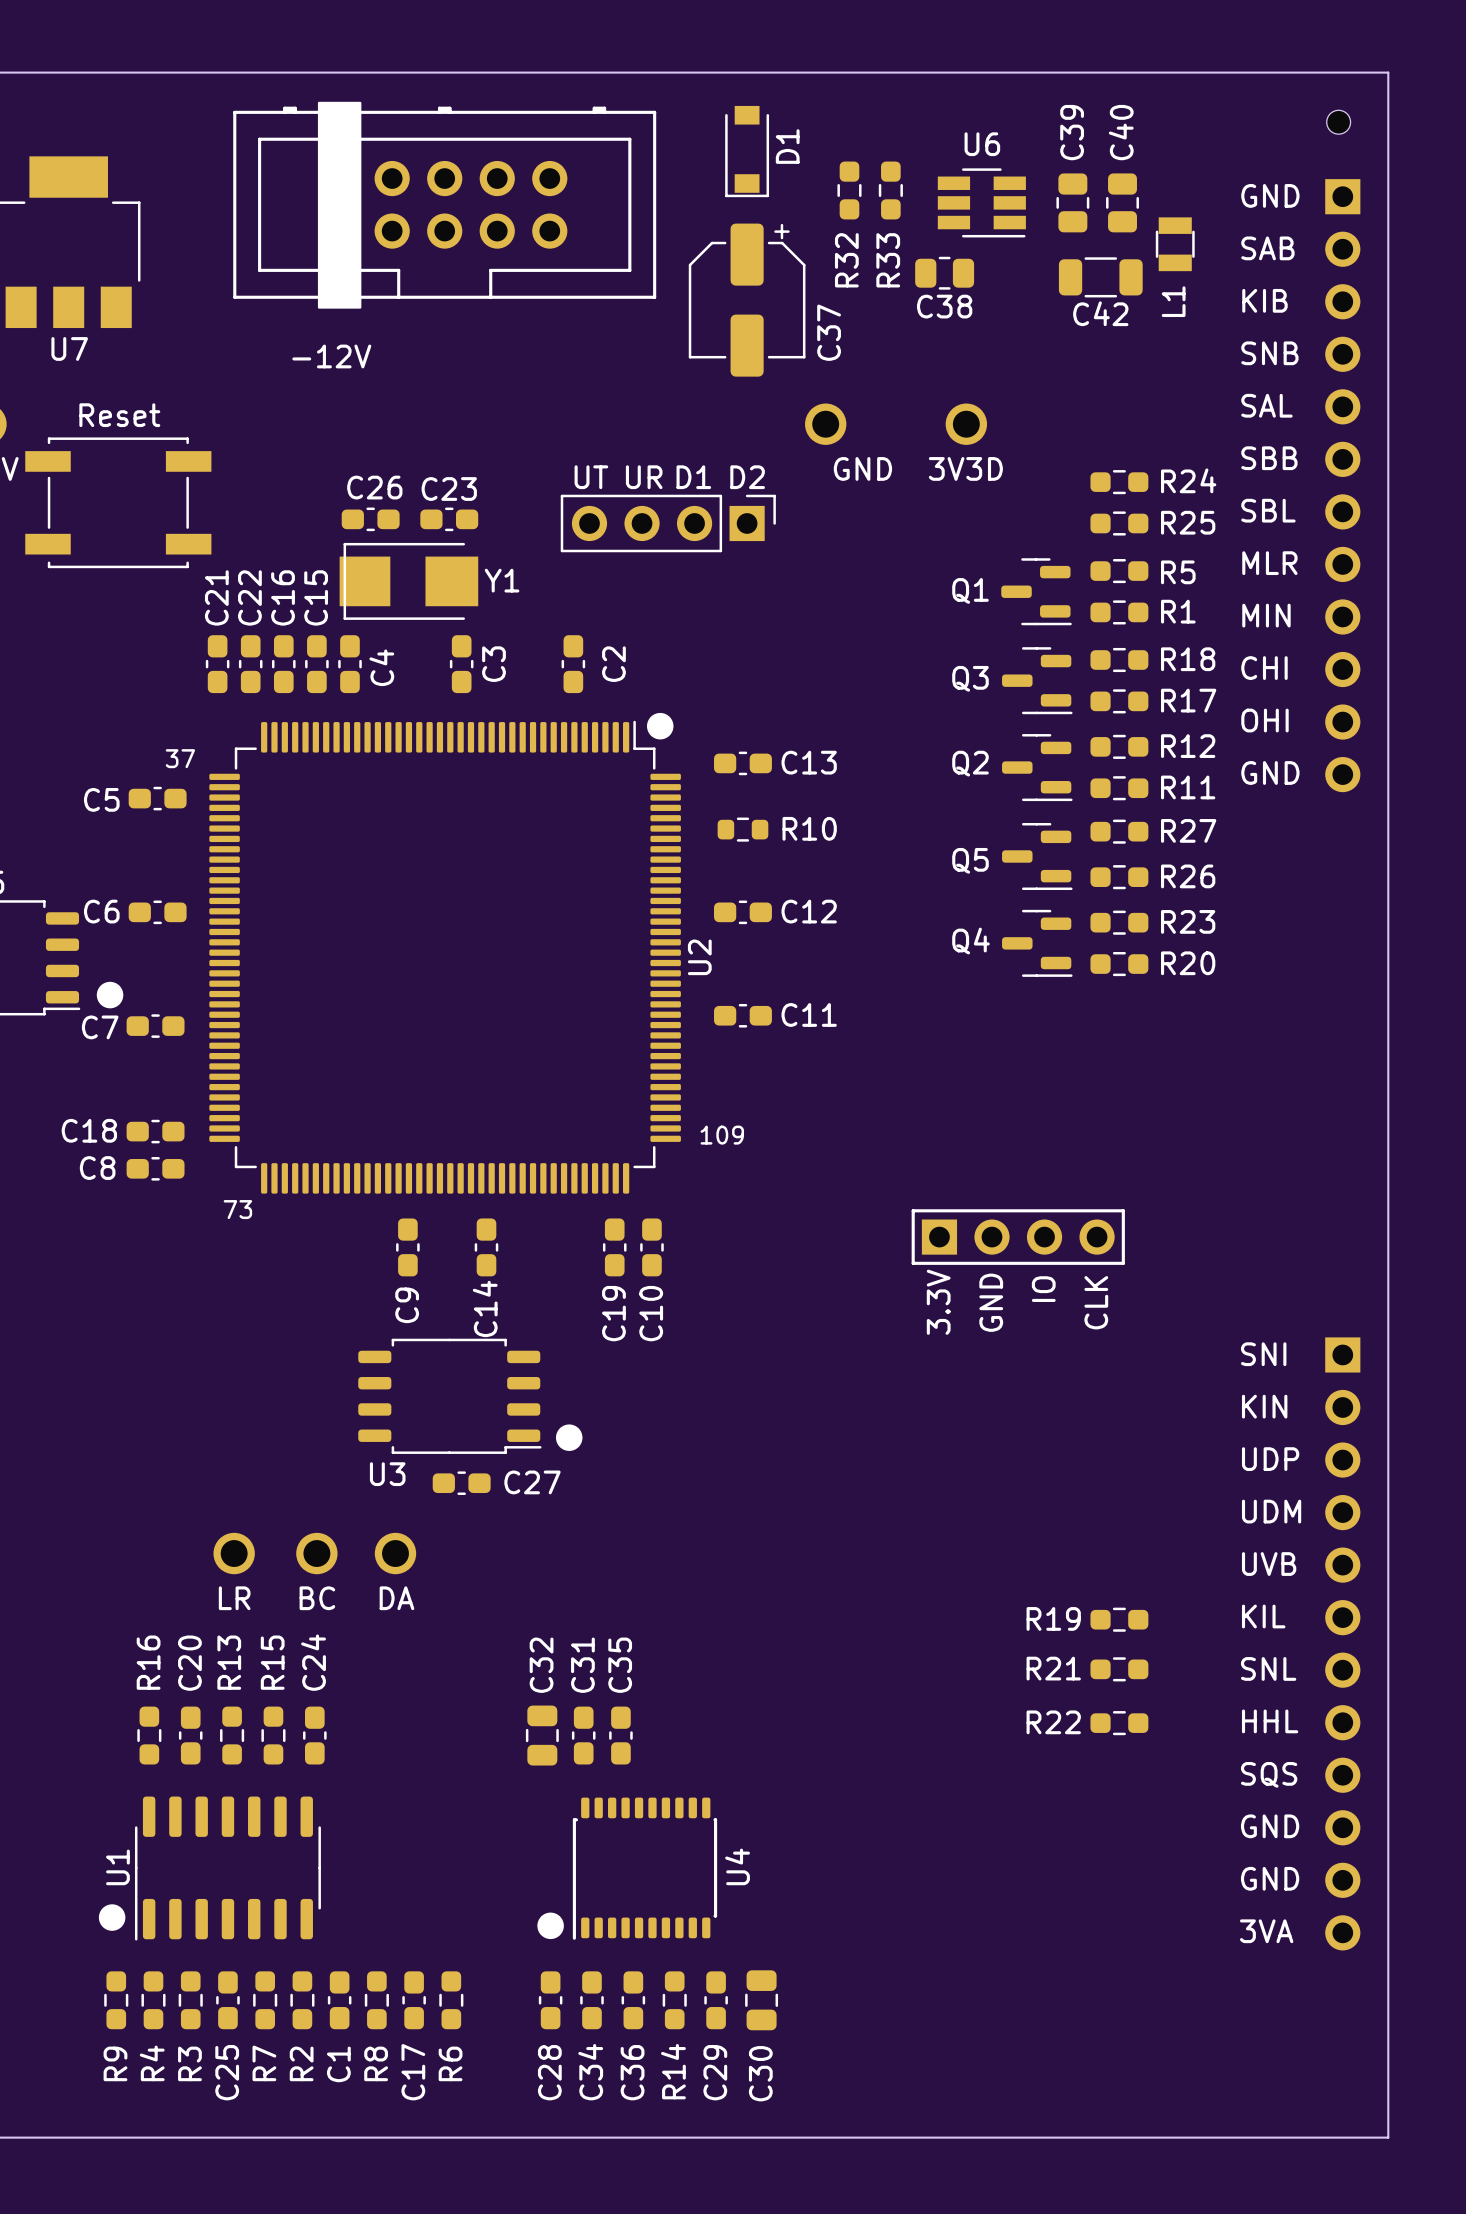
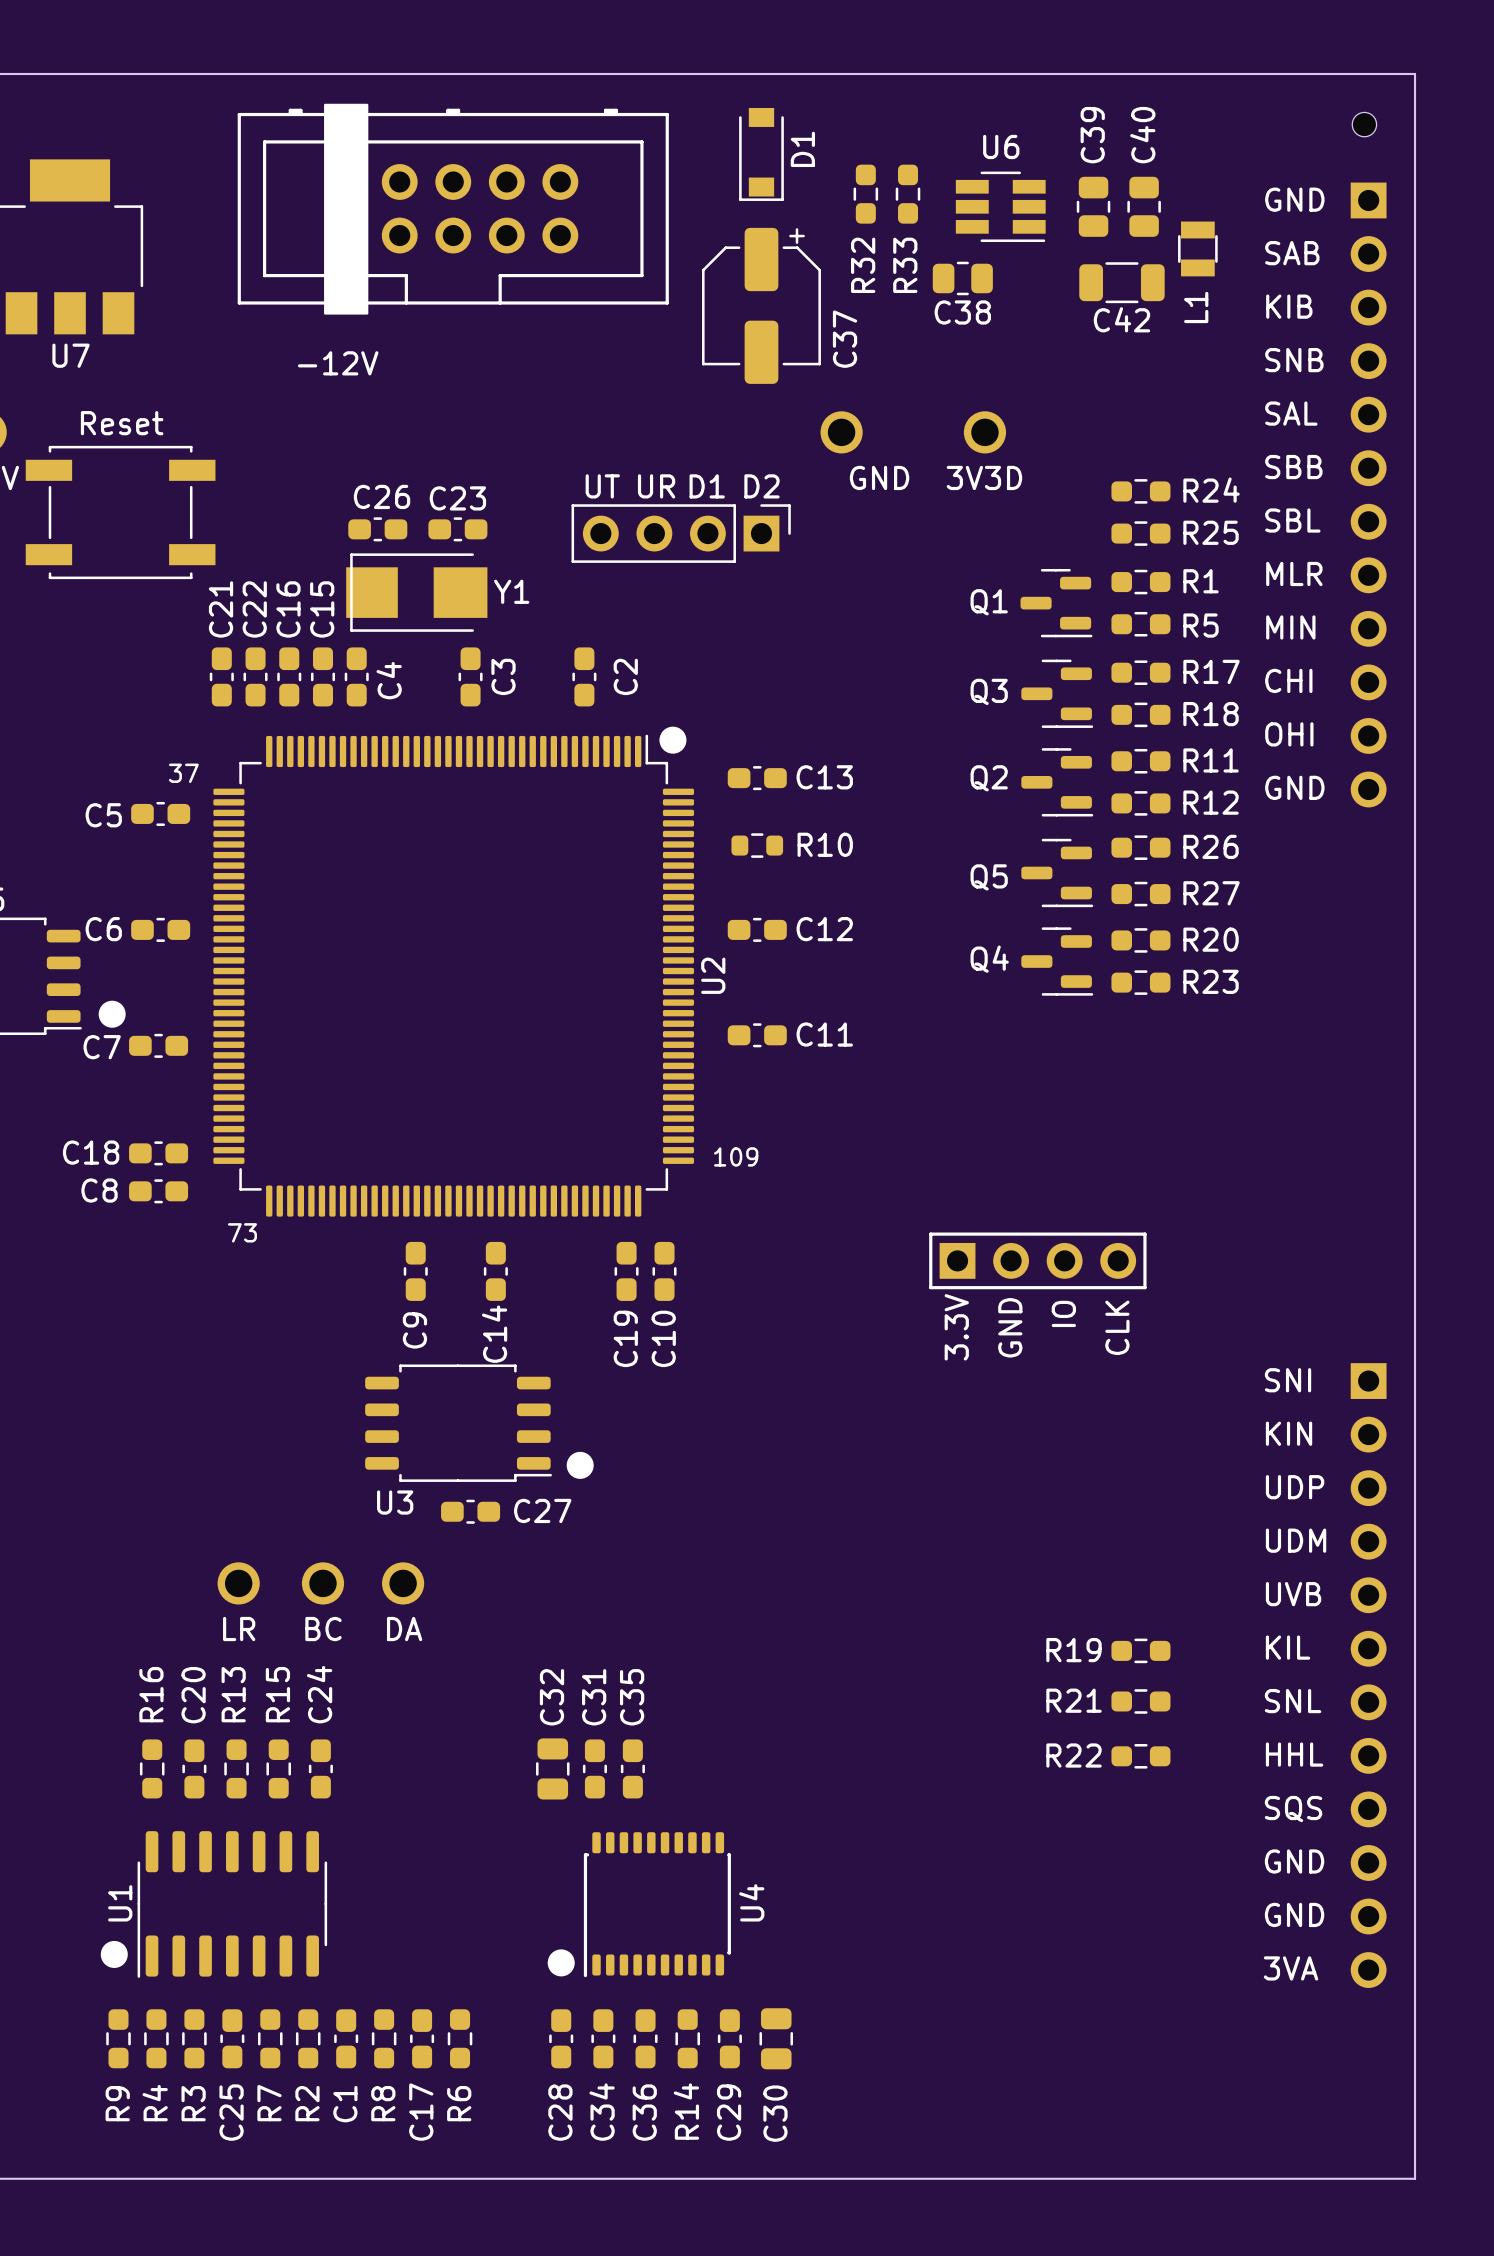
R5 name: R5 (1178, 572) -> R1 (1200, 581)
R1 name: R1 (1178, 611) -> R5 (1200, 625)
R18 name: R18 (1188, 659) -> R17 (1211, 671)
R17 name: R17 (1188, 700) -> R18 (1211, 714)
R12 name: R12 (1188, 746) -> R11 (1211, 760)
R11 name: R11 (1188, 787) -> R12 (1211, 802)
R27 name: R27 (1188, 830) -> R26 (1211, 846)
R26 name: R26 (1188, 876) -> R27 (1211, 893)
R23 name: R23 (1188, 921) -> R20 (1211, 939)
R20 name: R20 (1188, 963) -> R23 (1211, 981)

